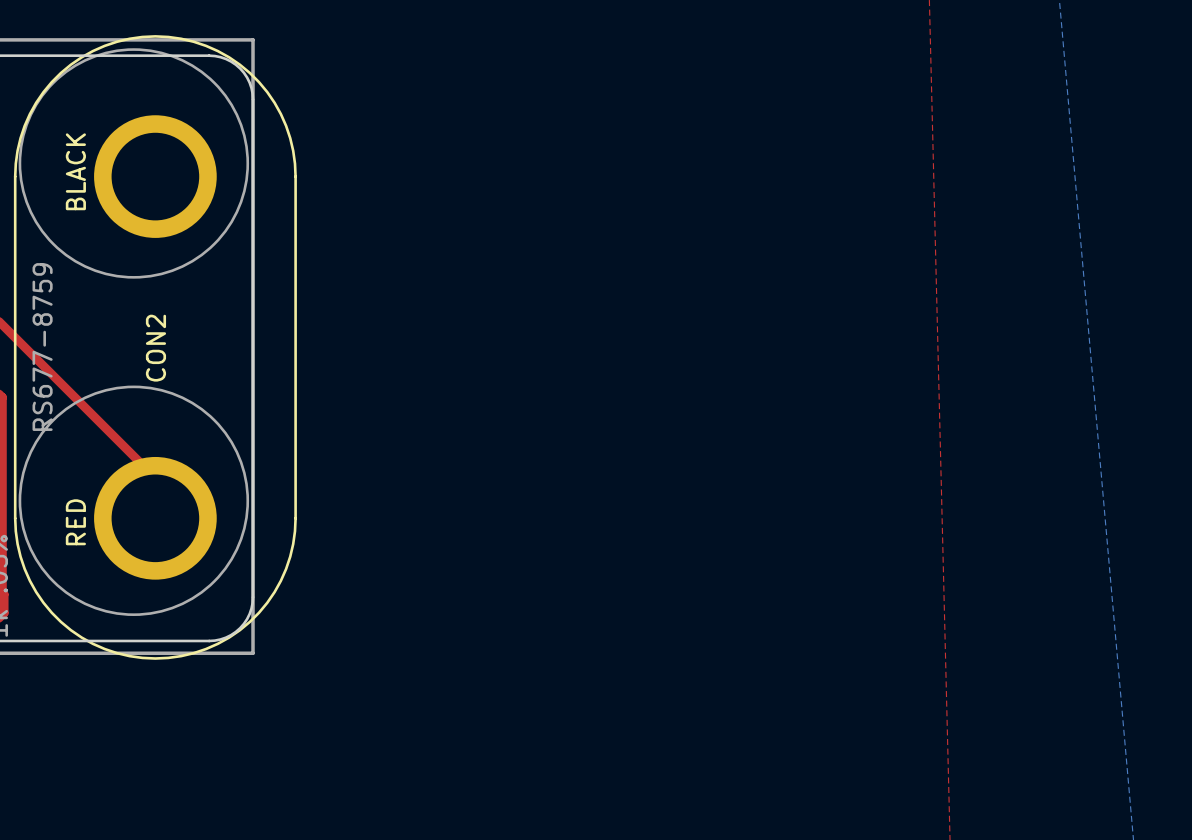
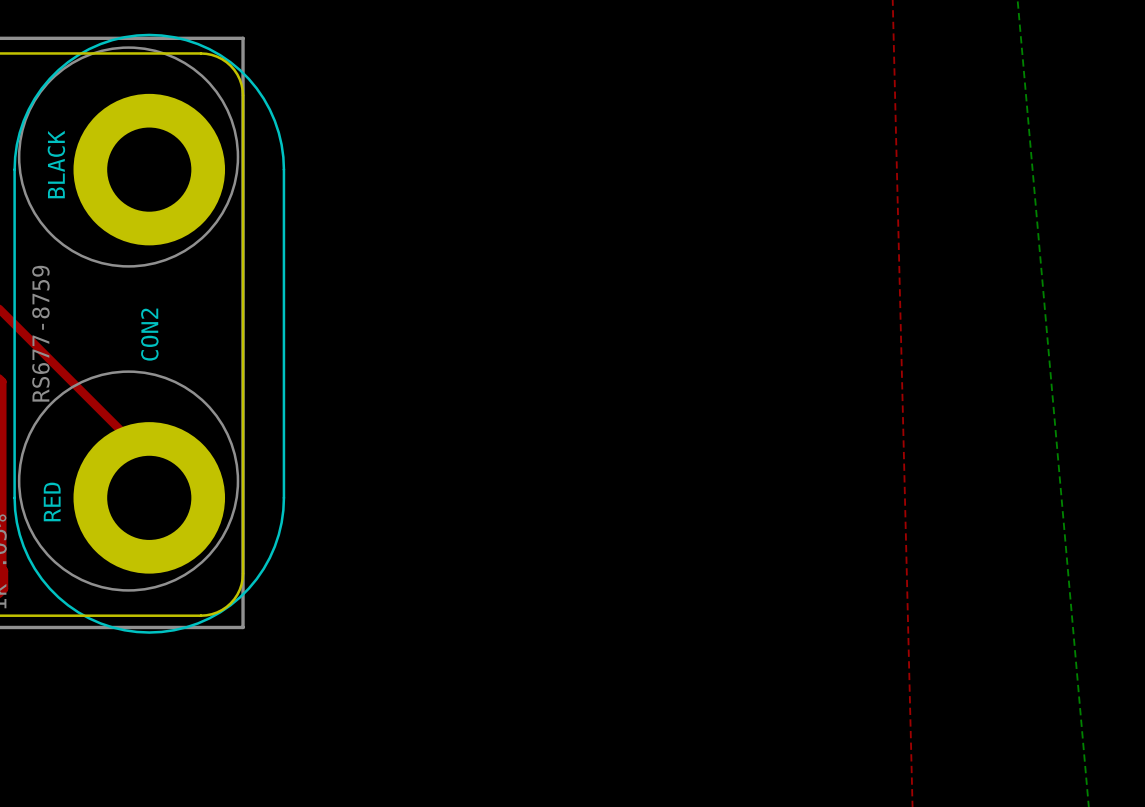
CON2 footprint: [13, 35, 297, 660] -> [13, 33, 286, 634]

